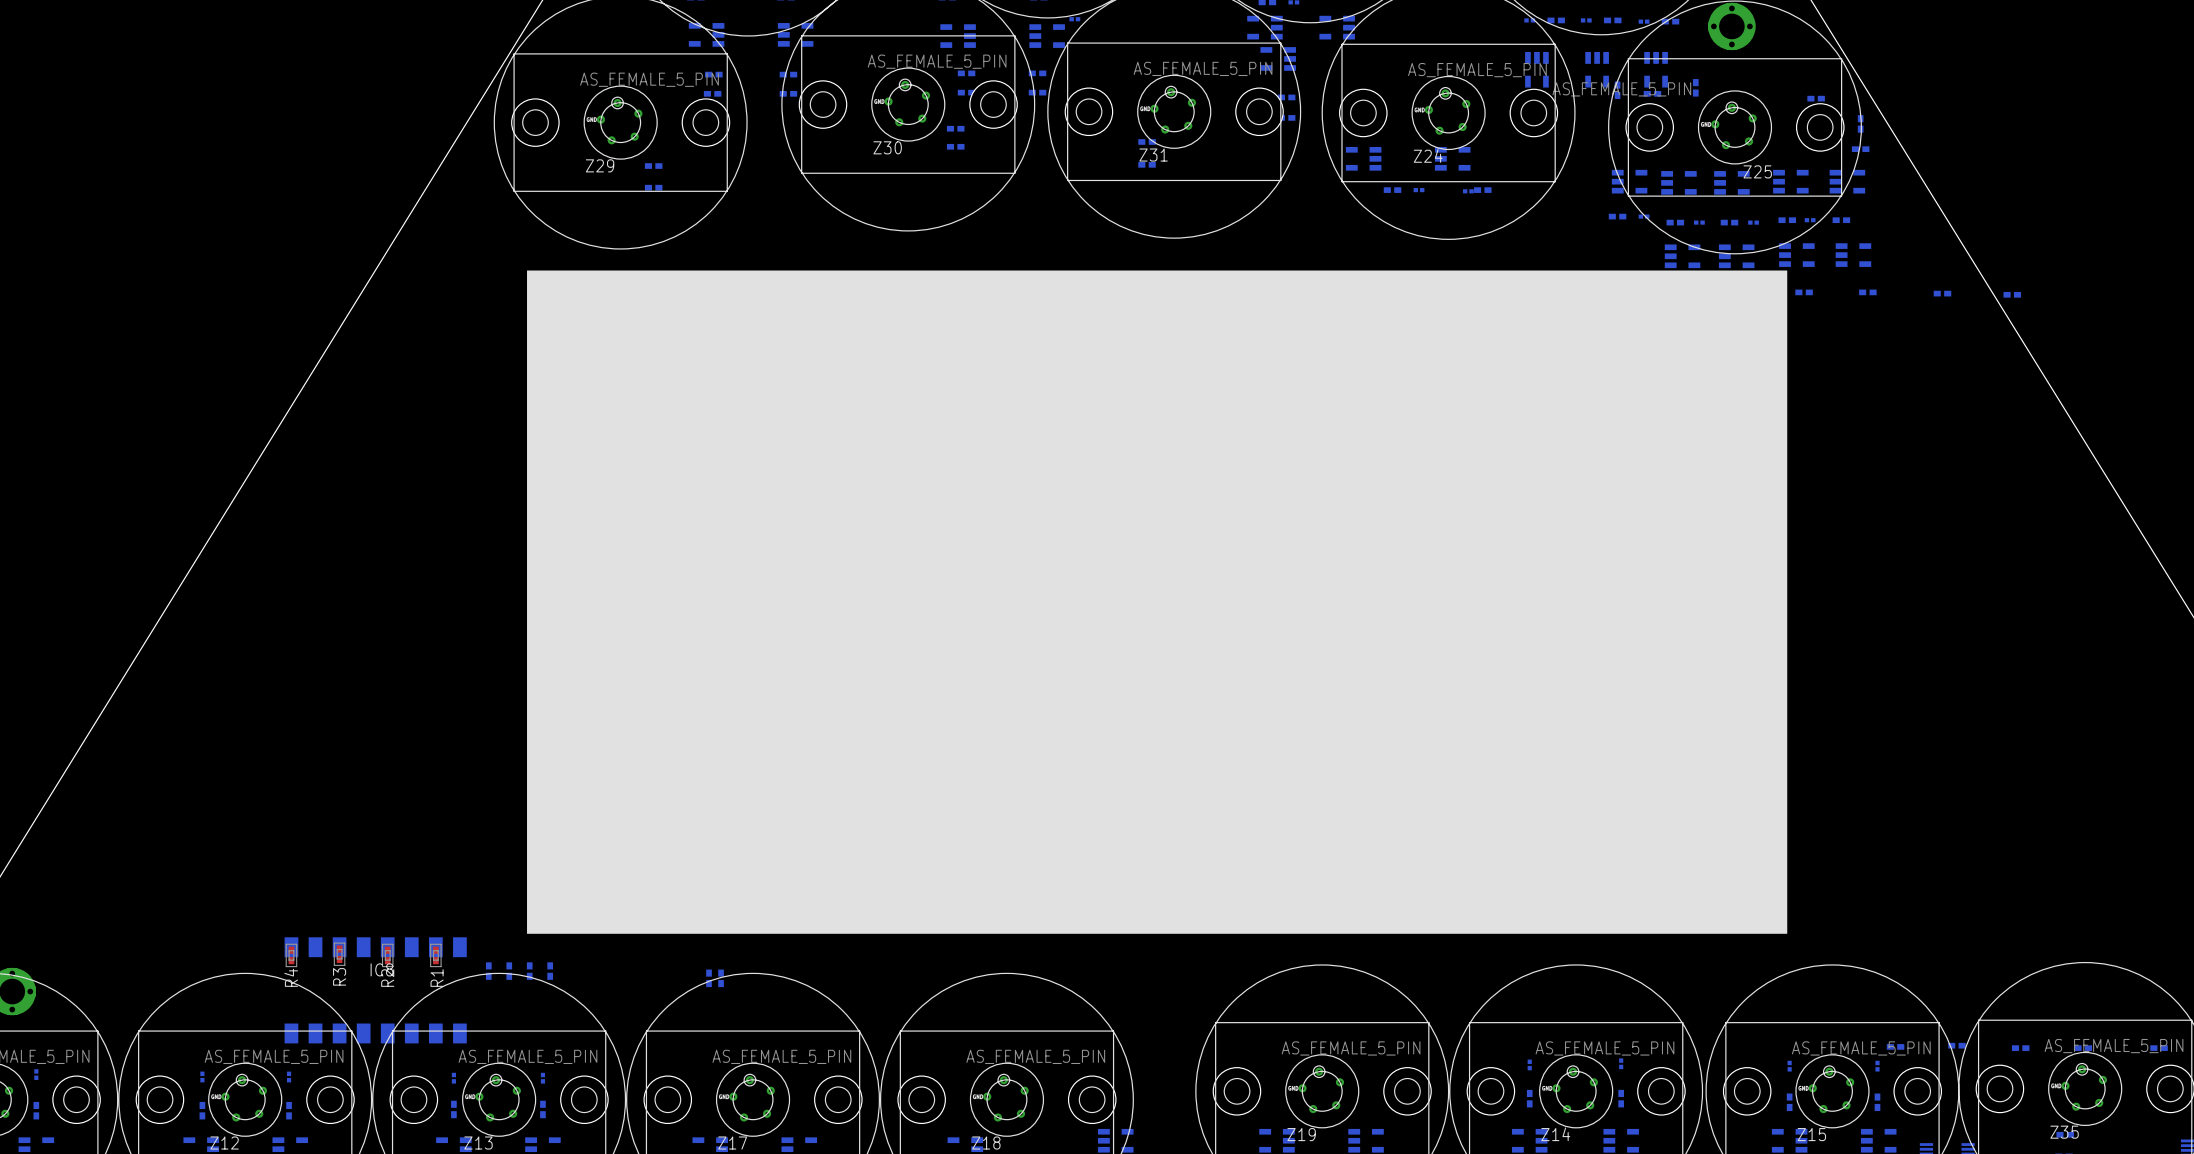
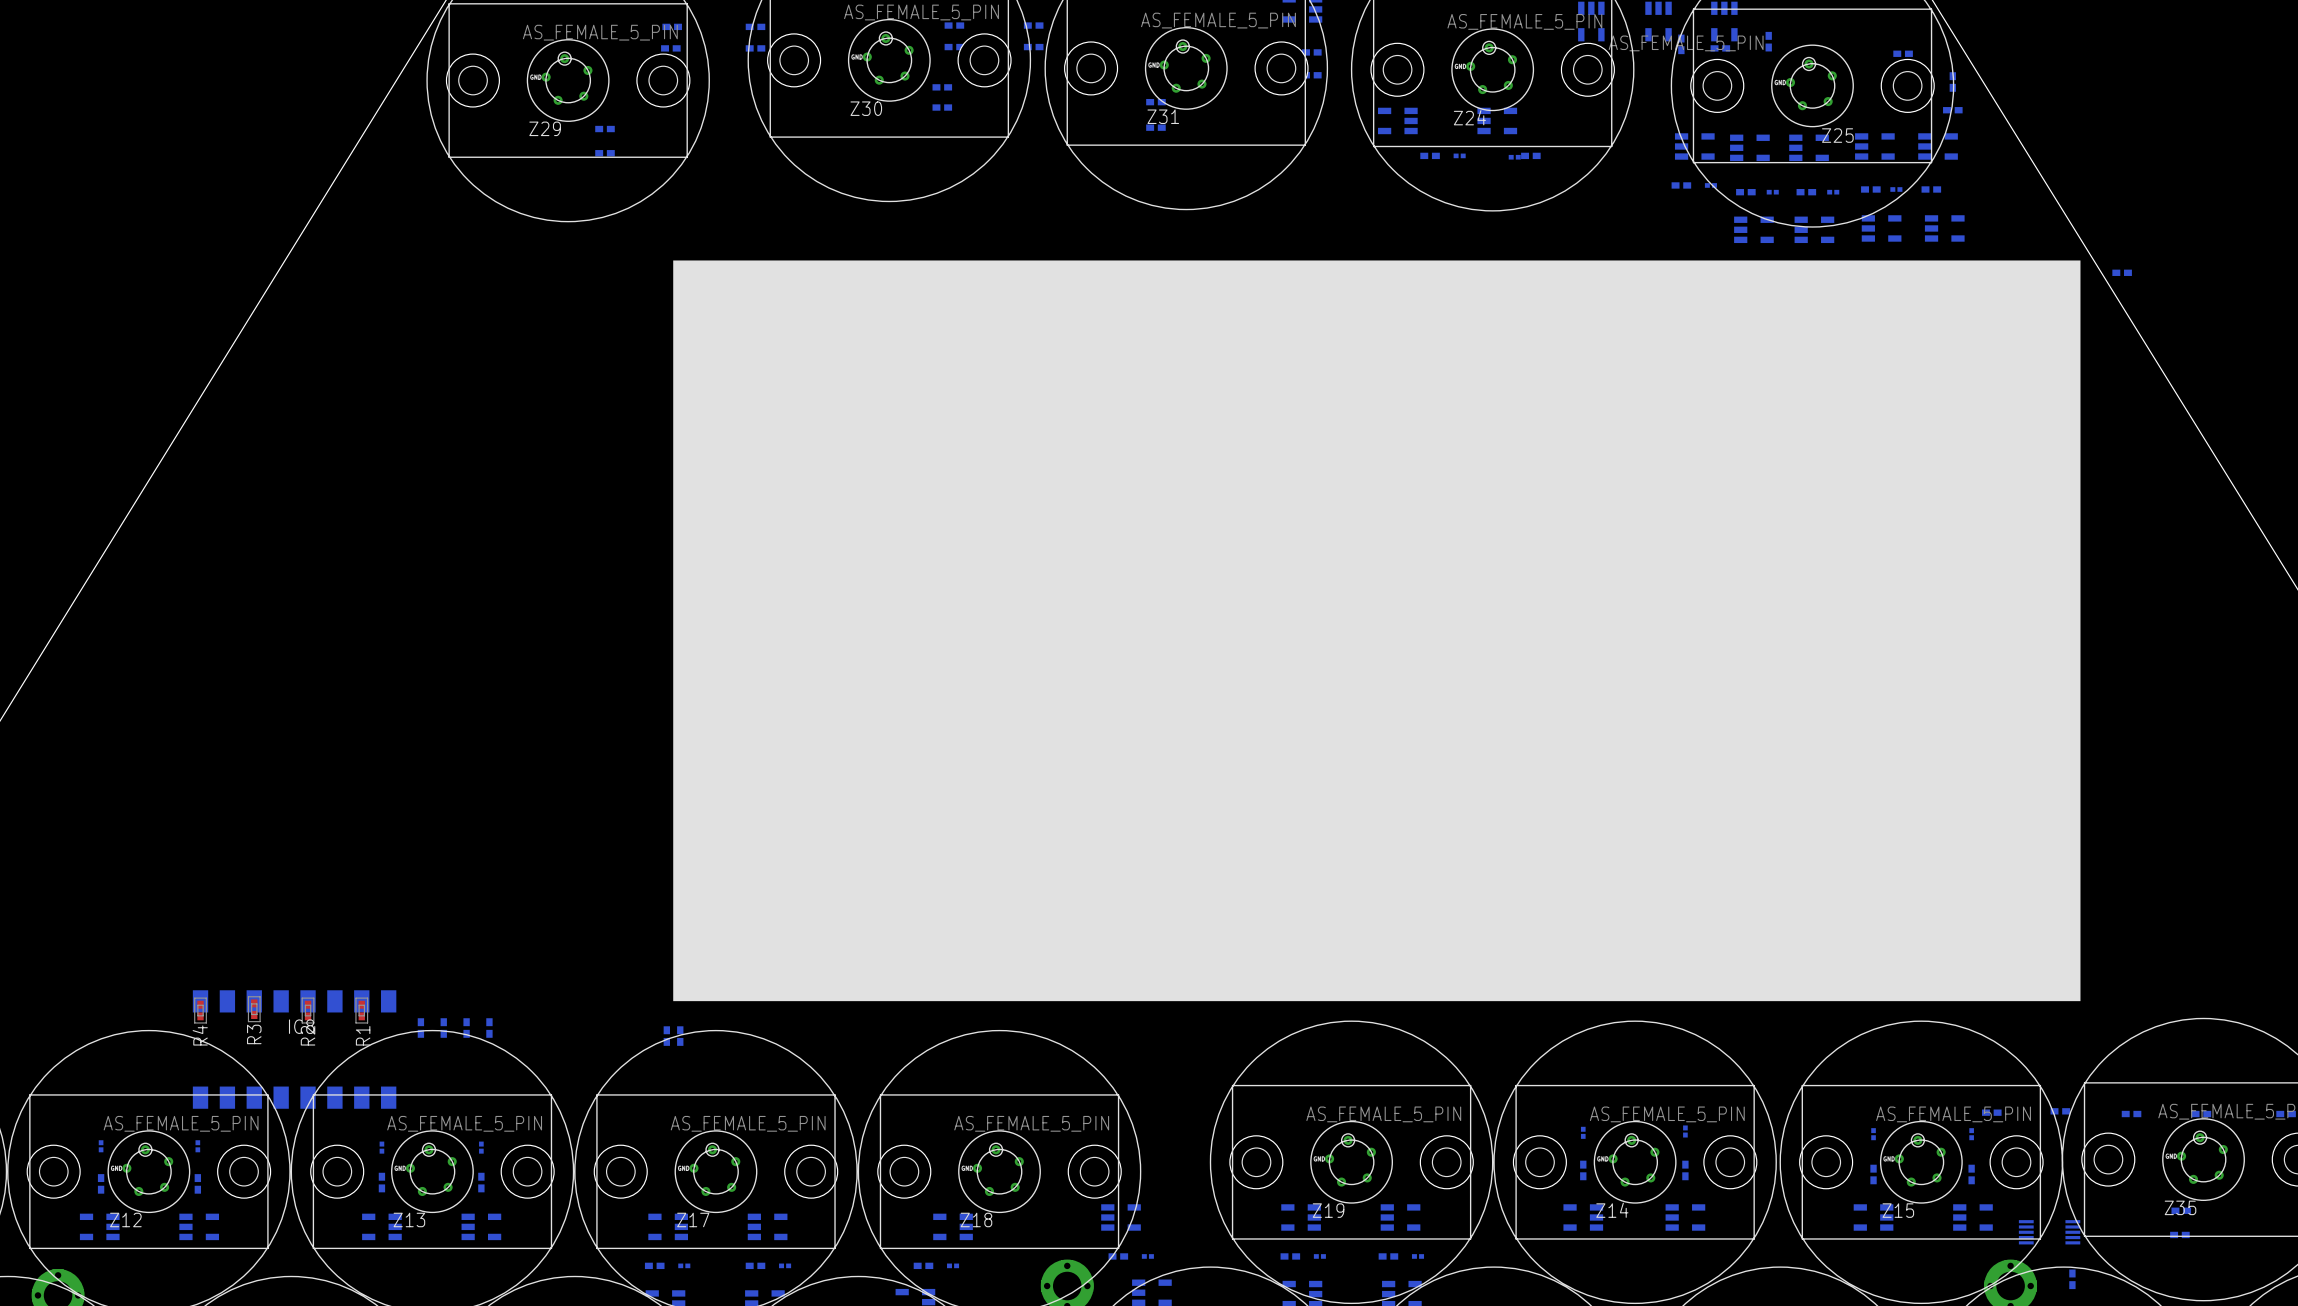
drawing position: (1157, 602) -> (1376, 630)

